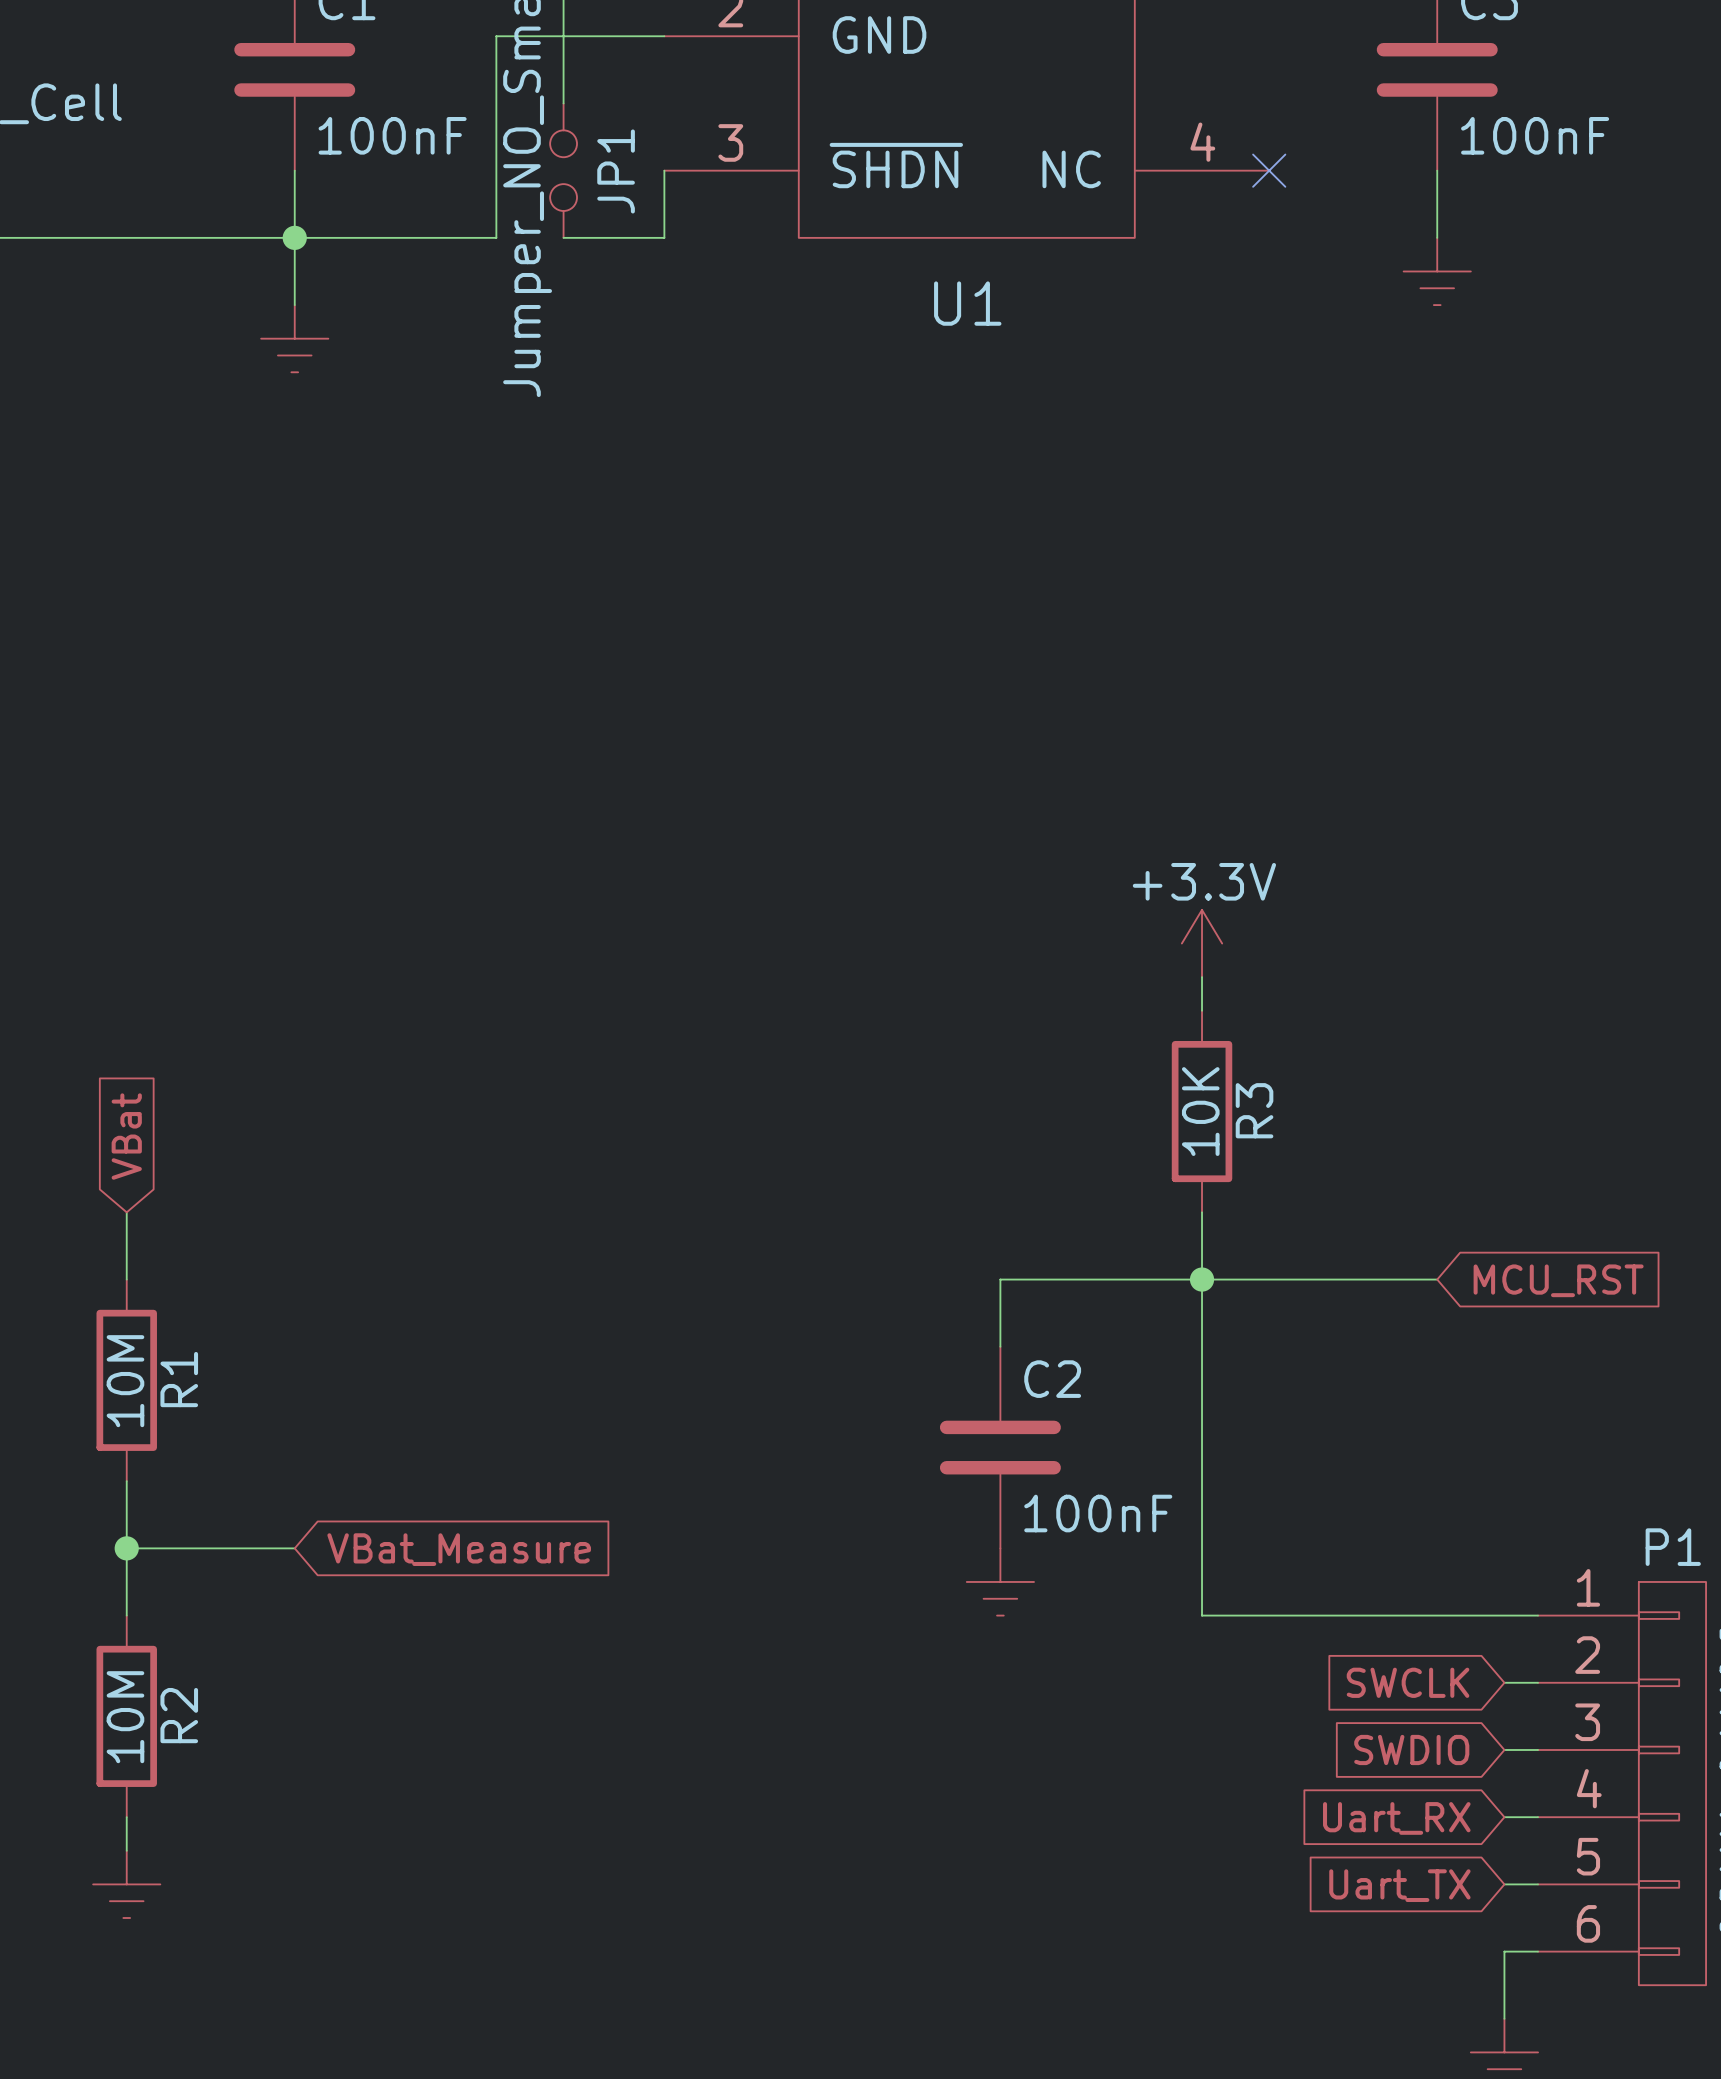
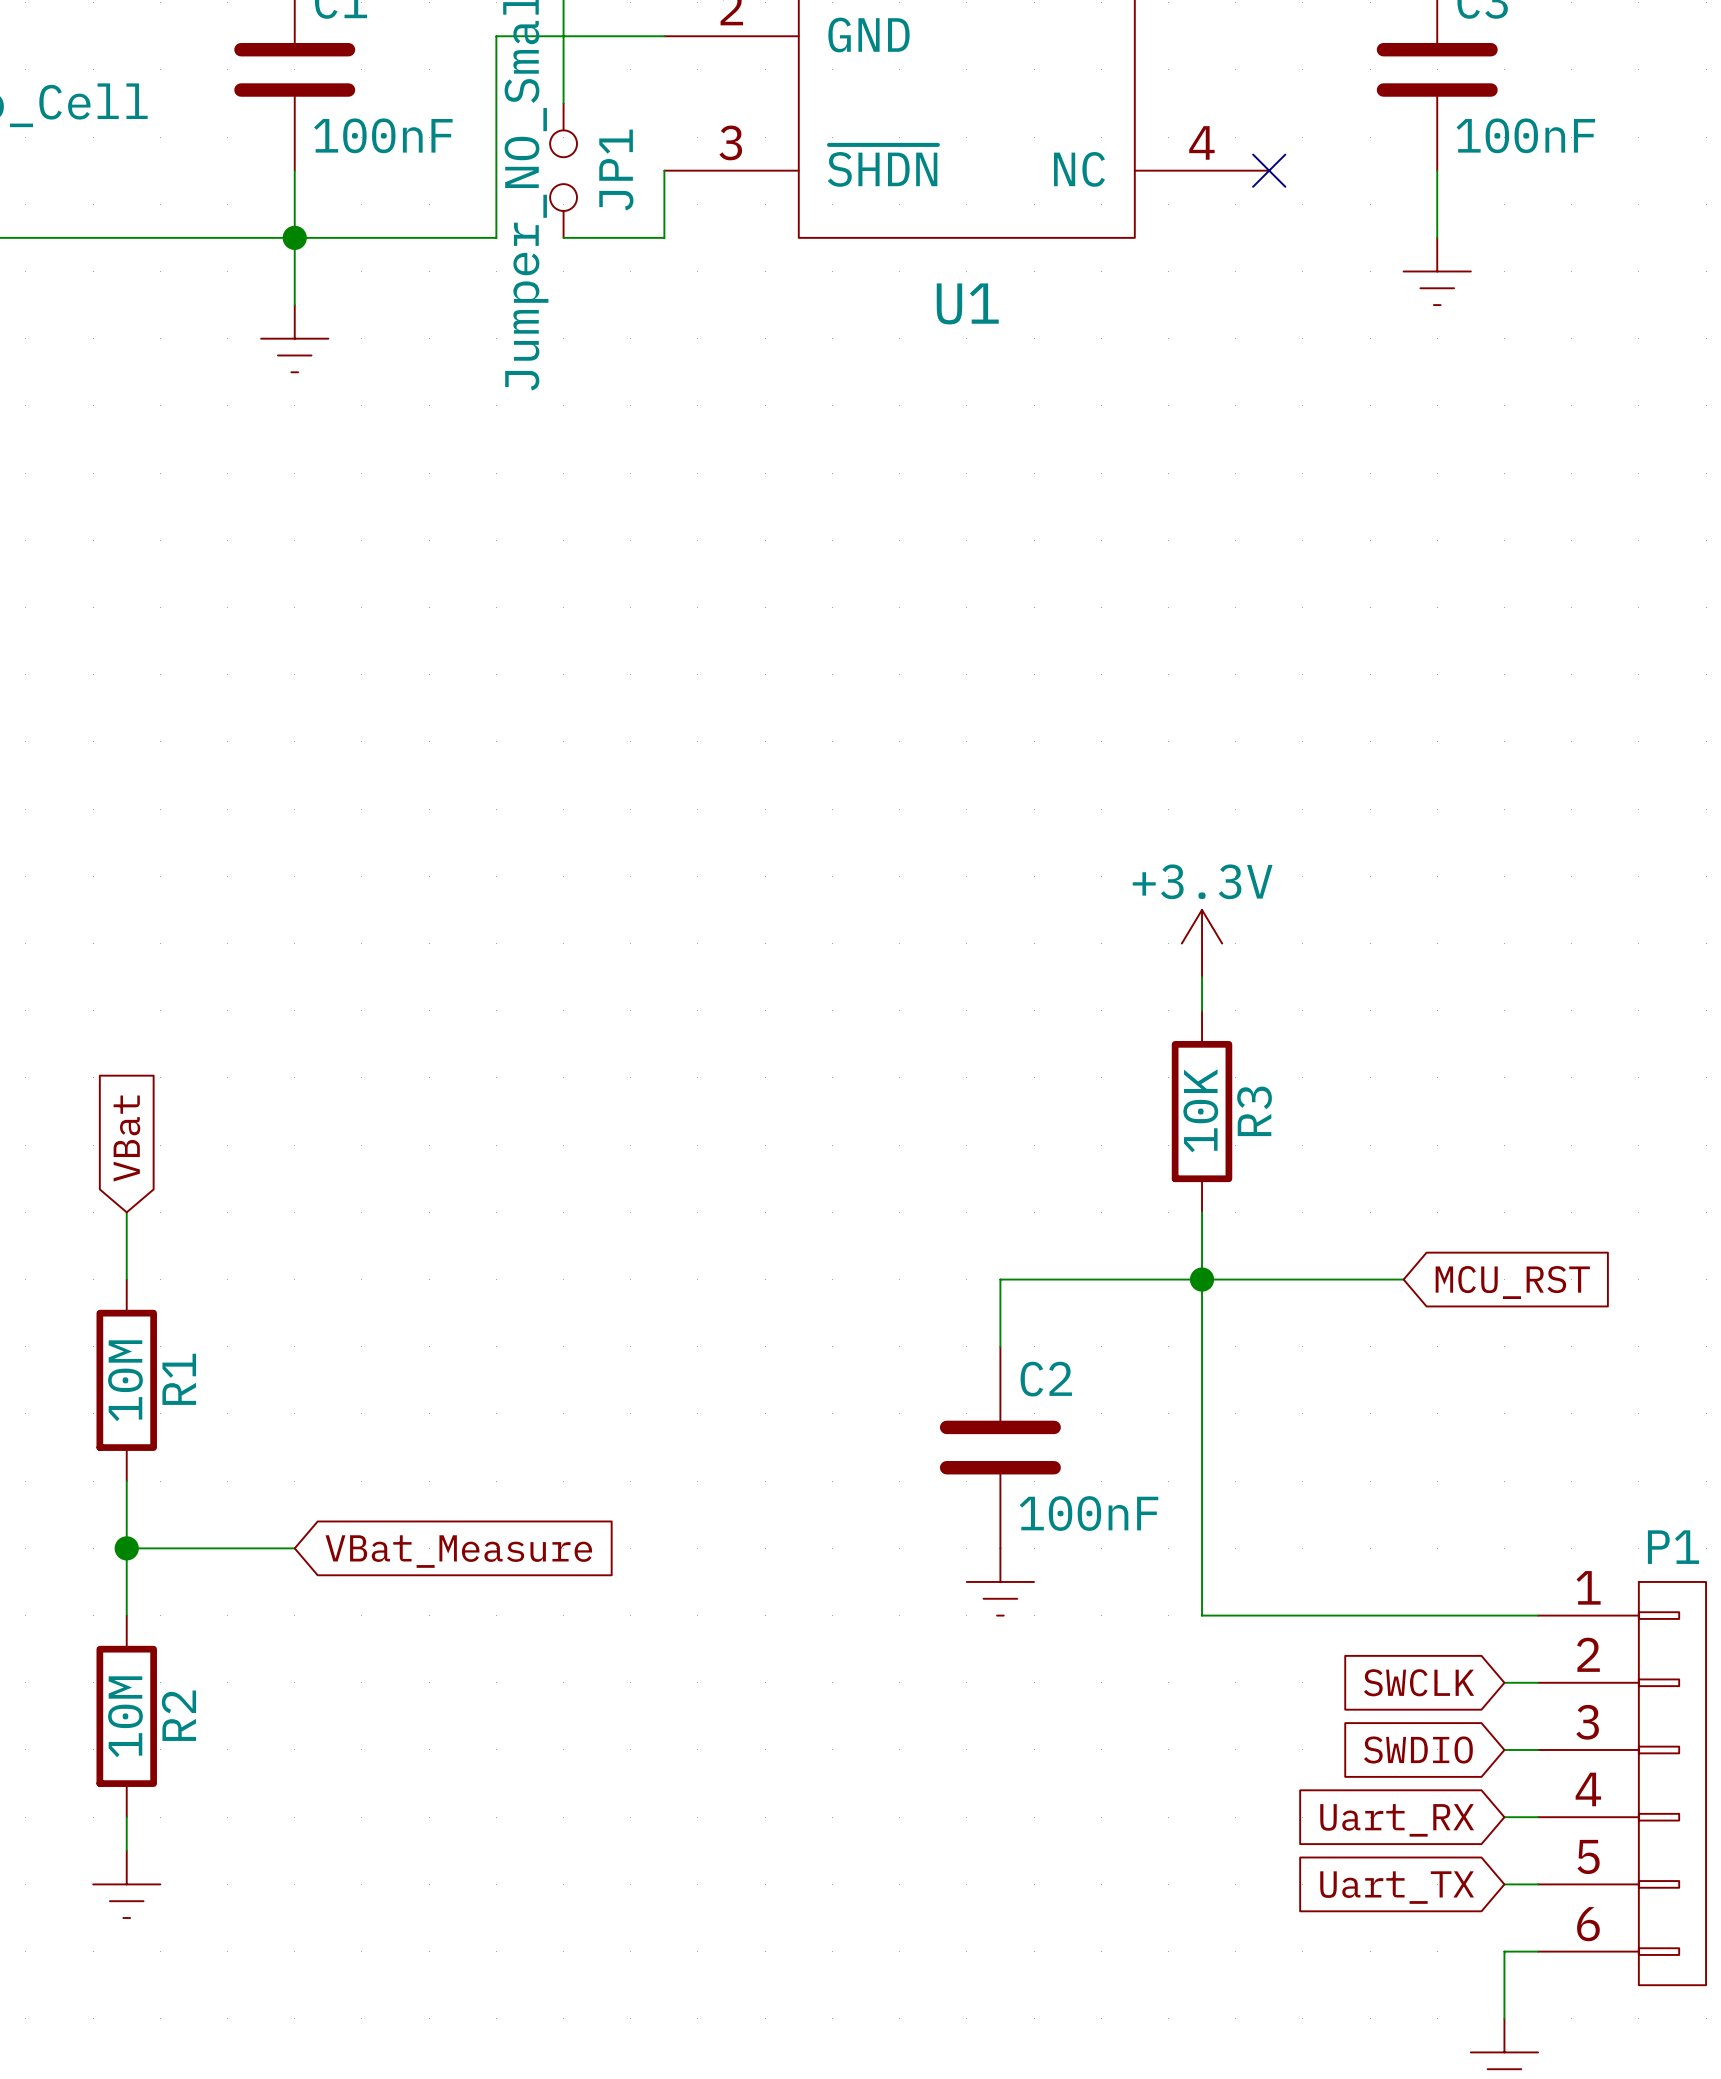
wire: (1403, 1279) (1437, 1279) -> none
global label position: MCU_RST (1558, 1280) -> MCU_RST (1512, 1282)

